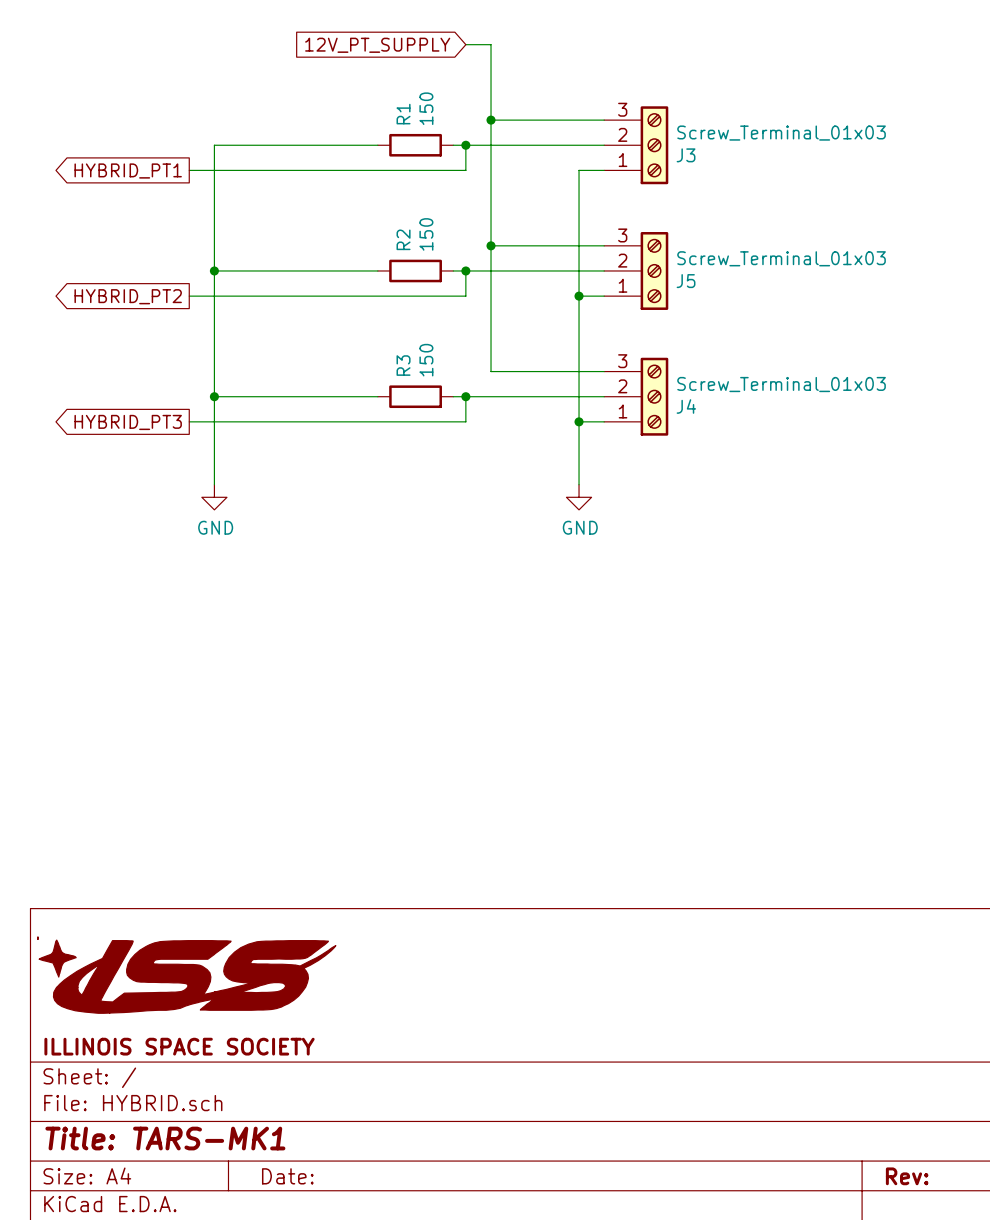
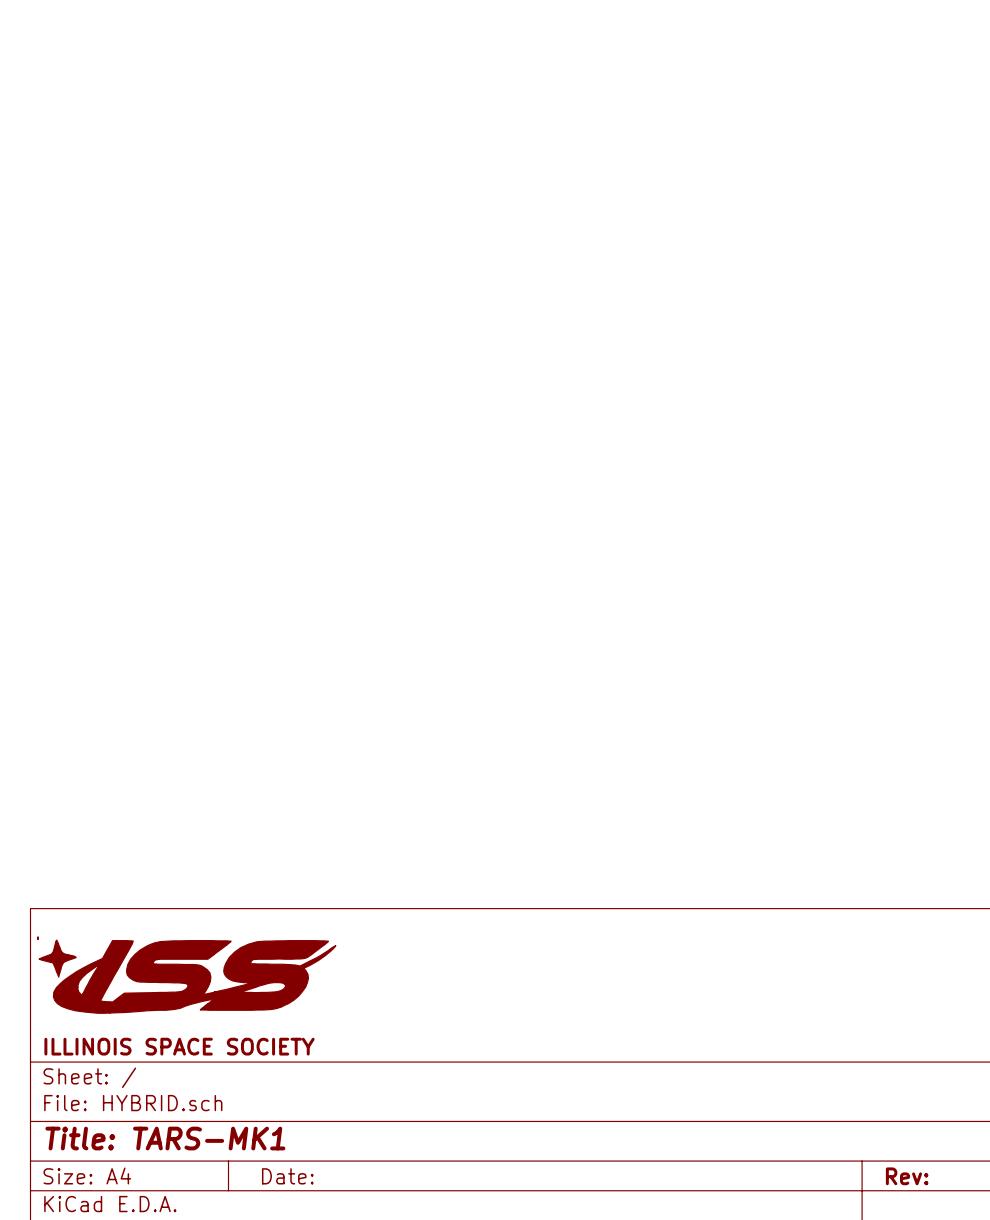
wire: (465, 44) (491, 44) (491, 371) (604, 371) -> none
global label: 12V_PT_SUPPLY (377, 45) -> none
wire: (491, 120) (604, 120) -> none
junction: (491, 120) -> none
wire: (377, 145) (214, 145) (214, 484) -> none
R1: 150 (415, 145) -> none
wire: (453, 145) (604, 145) -> none
wire: (465, 145) (465, 170) (189, 170) -> none
junction: (465, 145) -> none
J3: Screw_Terminal_01x03 (636, 145) -> none
wire: (604, 170) (579, 170) (579, 484) -> none
global label: HYBRID_PT1 (128, 171) -> none
wire: (491, 245) (604, 245) -> none
junction: (491, 245) -> none
wire: (214, 270) (377, 270) -> none
junction: (214, 270) -> none
R2: 150 (415, 270) -> none
wire: (453, 270) (604, 270) -> none
wire: (465, 270) (465, 296) (189, 296) -> none
junction: (465, 270) -> none
J5: Screw_Terminal_01x03 (636, 270) -> none
global label: HYBRID_PT2 (128, 296) -> none
wire: (579, 296) (604, 296) -> none
junction: (579, 296) -> none
wire: (214, 396) (377, 396) -> none
junction: (214, 396) -> none
R3: 150 (415, 396) -> none
wire: (453, 396) (604, 396) -> none
wire: (465, 396) (465, 421) (189, 421) -> none
junction: (465, 396) -> none
J4: Screw_Terminal_01x03 (636, 396) -> none
wire: (579, 421) (604, 421) -> none
junction: (579, 421) -> none
global label: HYBRID_PT3 (128, 422) -> none
power symbol: GND (214, 497) -> none
power symbol: GND (579, 497) -> none

